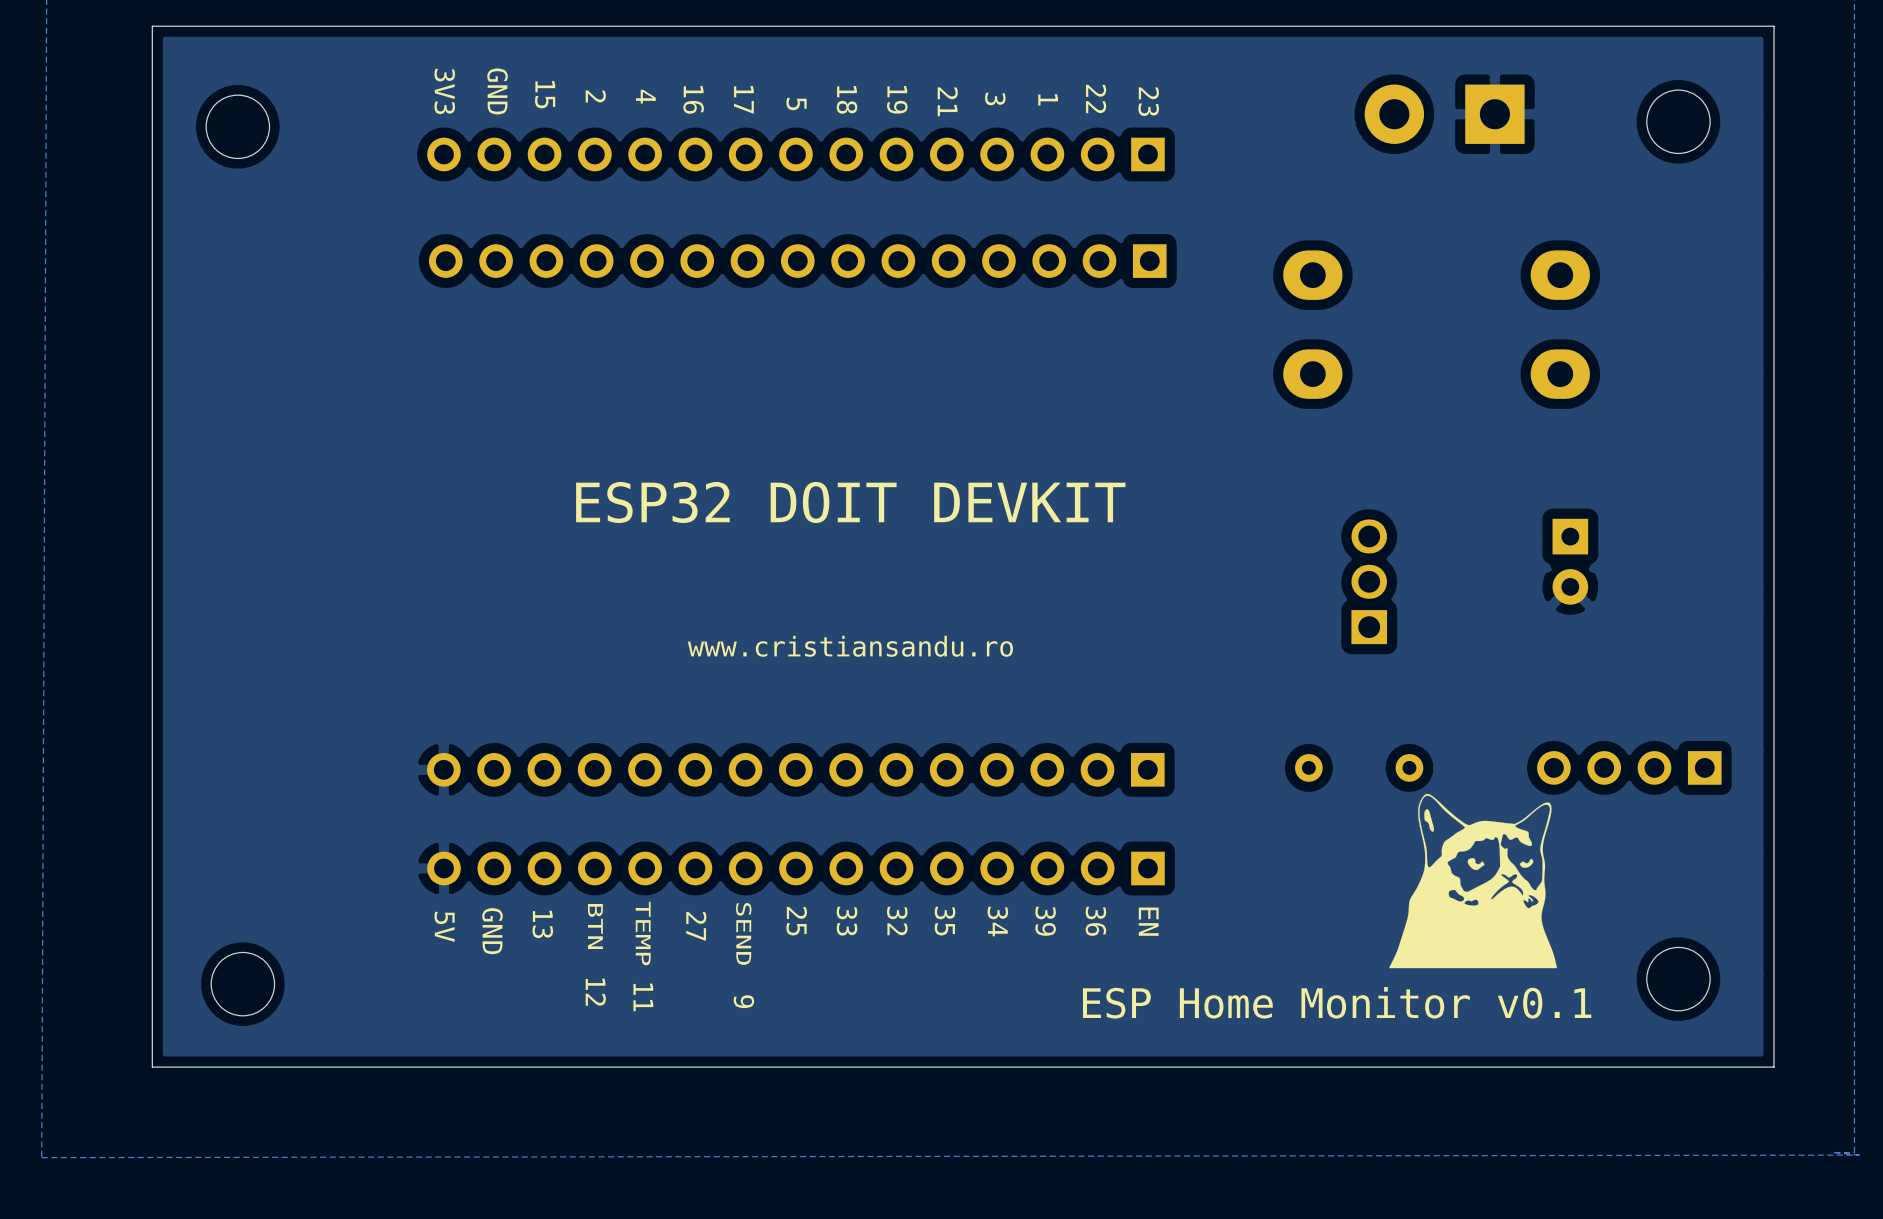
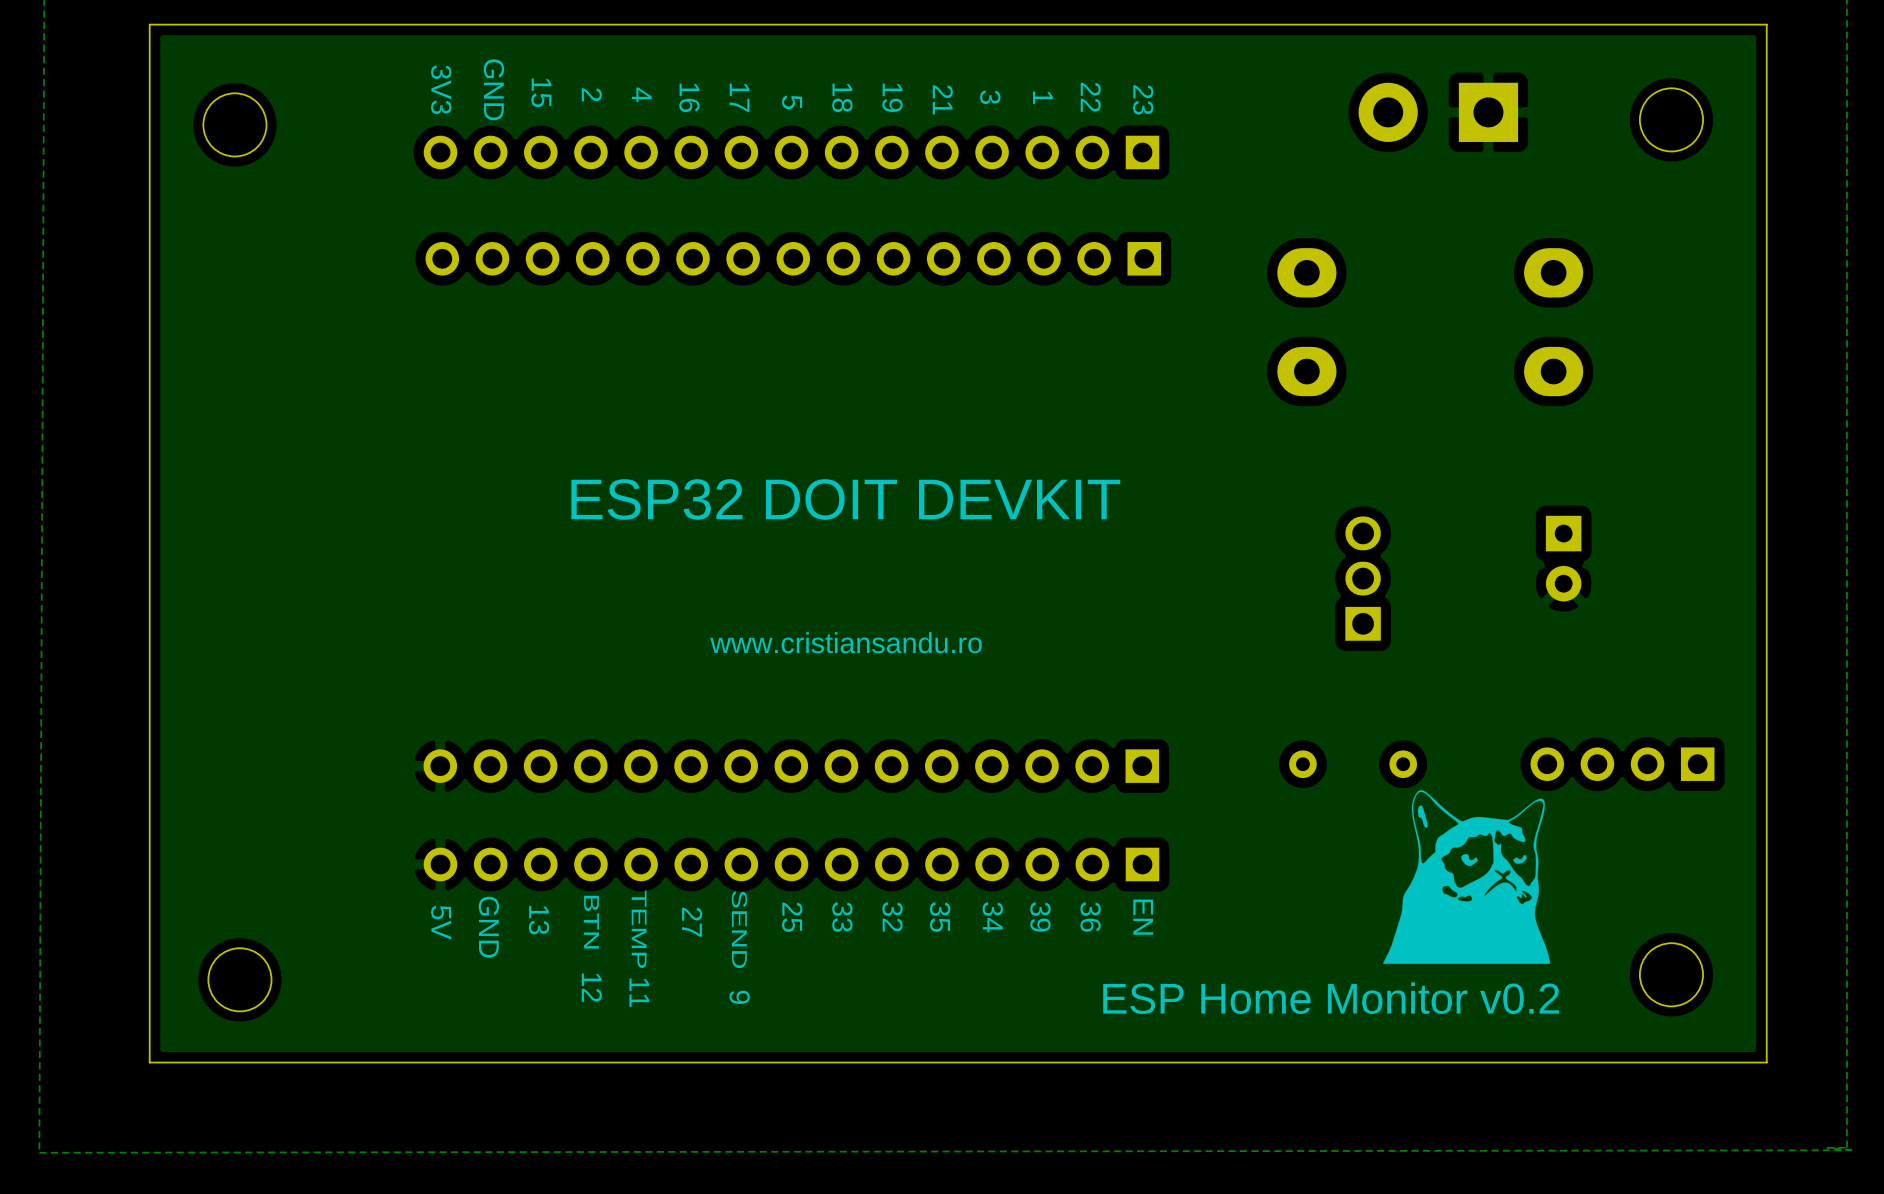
text: ESP Home Monitor v0.1 (1337, 1002) -> ESP Home Monitor v0.2 (1331, 998)

